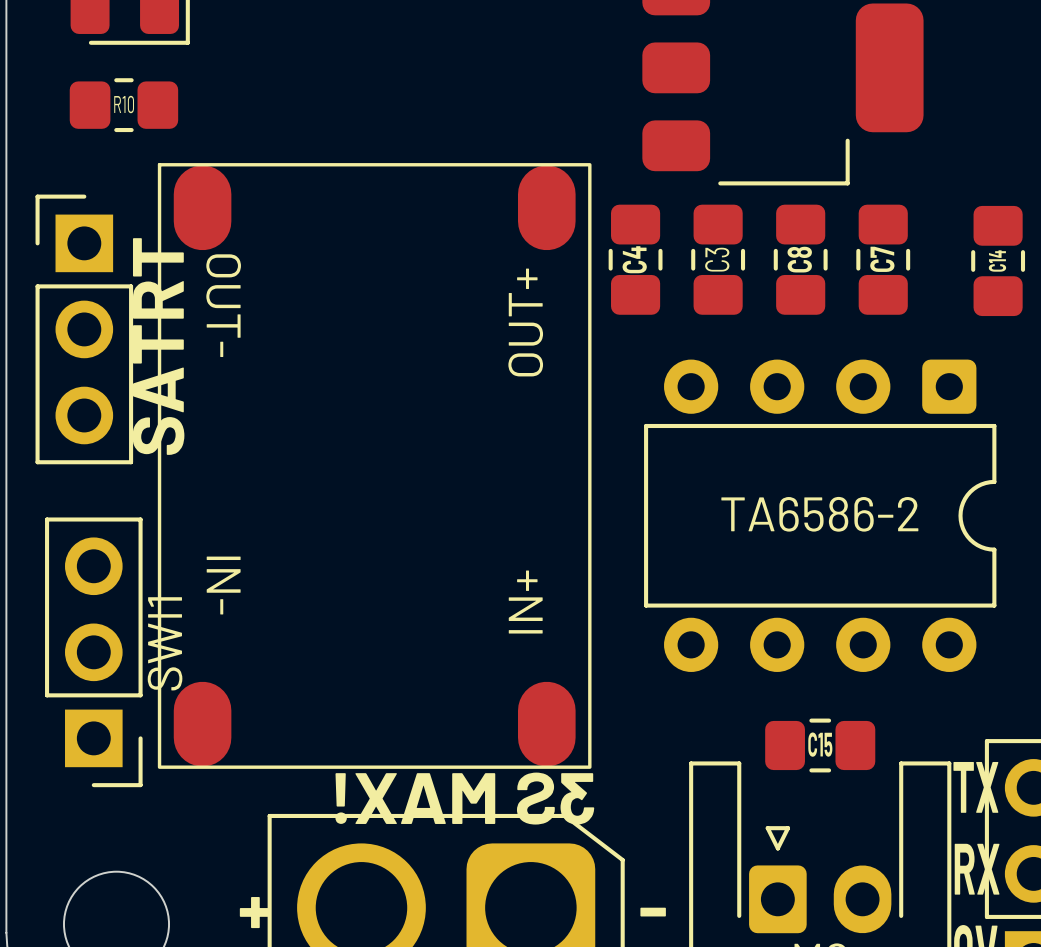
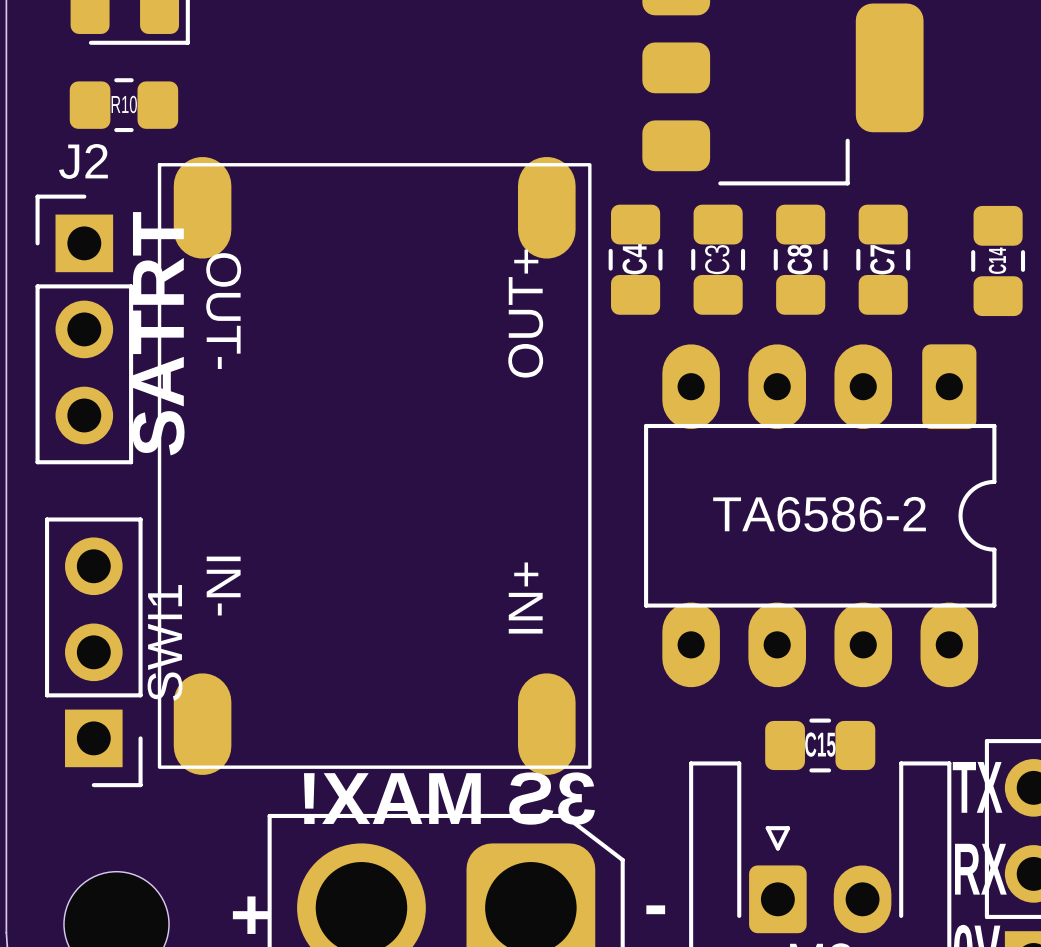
J2 name: none -> J2 (83, 161)
part footprint: [157, 163, 592, 769] -> [157, 156, 592, 775]
TA6586-2 footprint: [644, 359, 997, 672] -> [644, 344, 997, 688]

